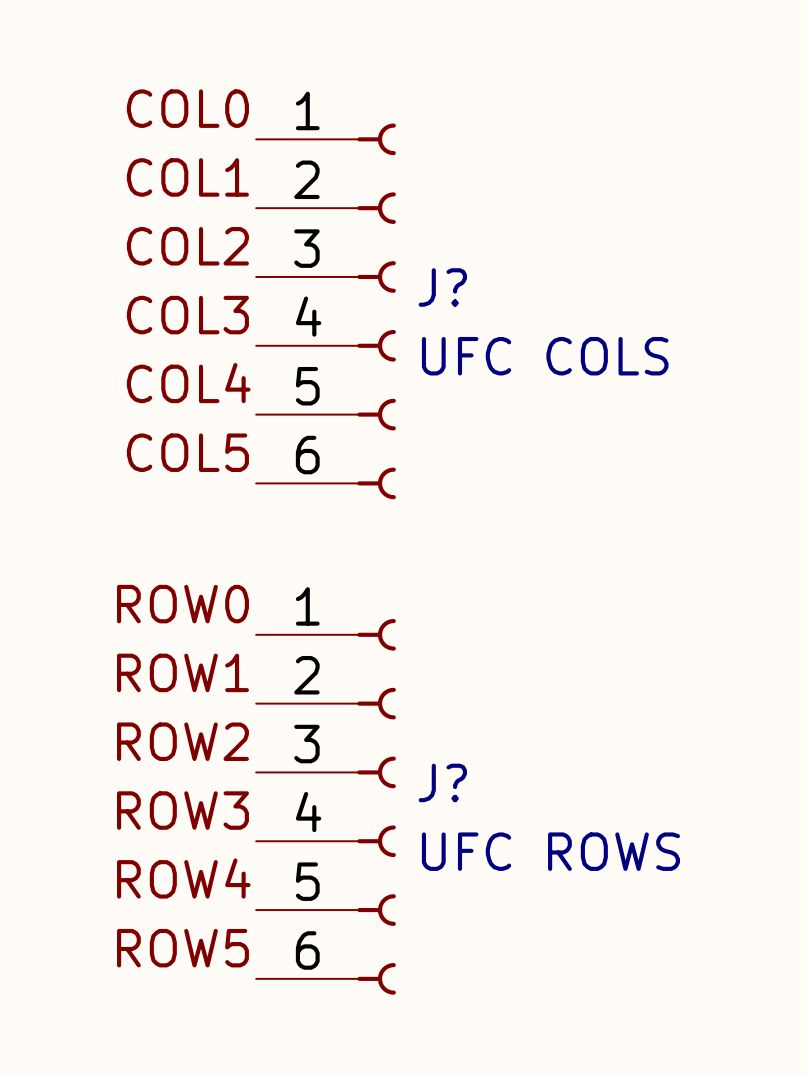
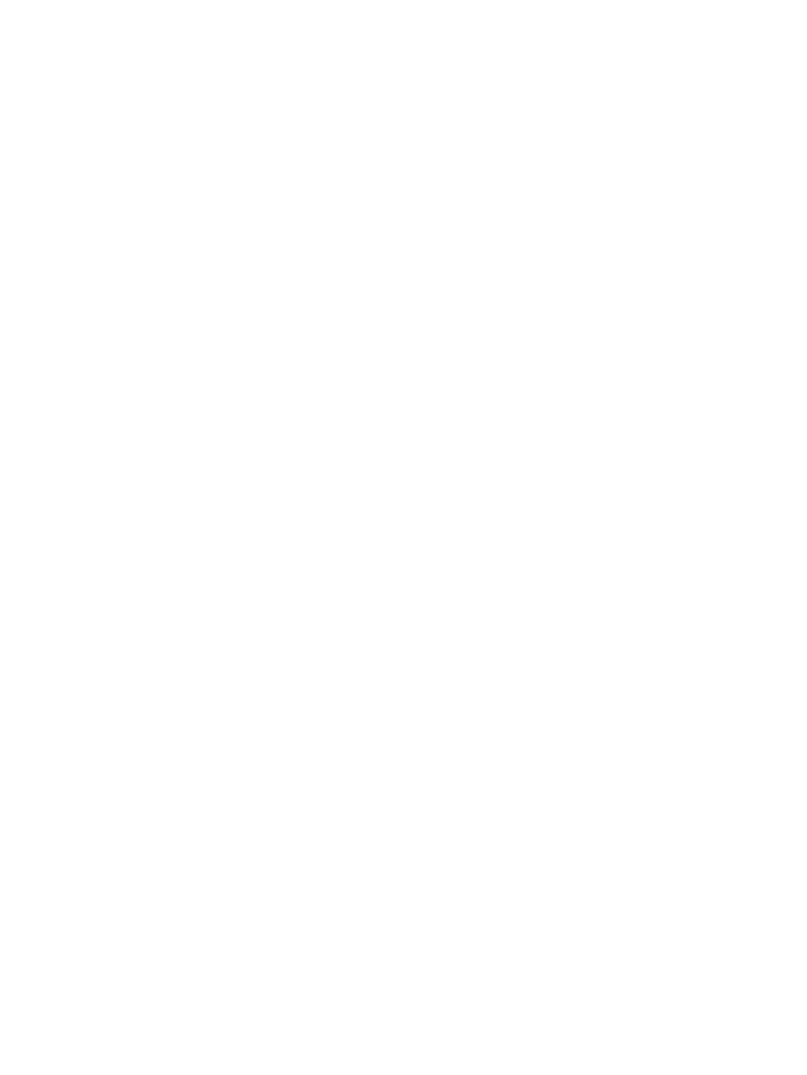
label: COL0 (187, 108) -> none
label: COL1 (187, 177) -> none
label: COL2 (187, 246) -> none
J?: UFC COLS (326, 311) -> none
label: COL3 (187, 315) -> none
label: COL4 (188, 383) -> none
label: COL5 (187, 452) -> none
label: ROW0 (182, 604) -> none
label: ROW1 (182, 672) -> none
label: ROW2 (182, 741) -> none
J?: UFC ROWS (326, 806) -> none
label: ROW3 (182, 810) -> none
label: ROW4 (183, 878) -> none
label: ROW5 (182, 948) -> none

